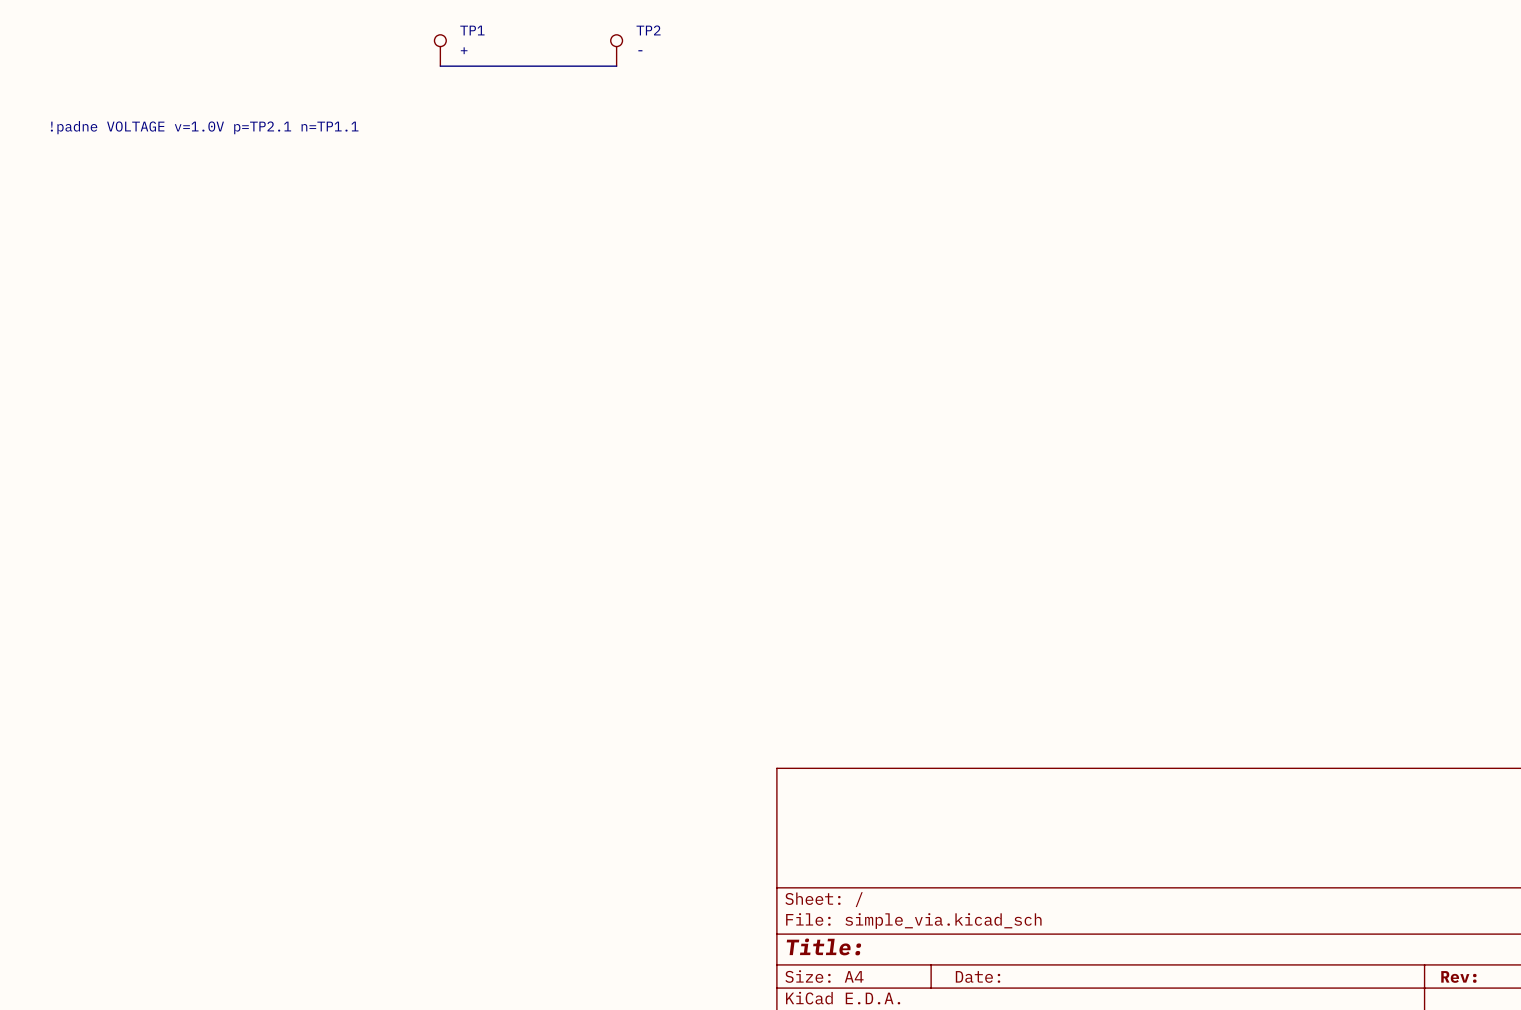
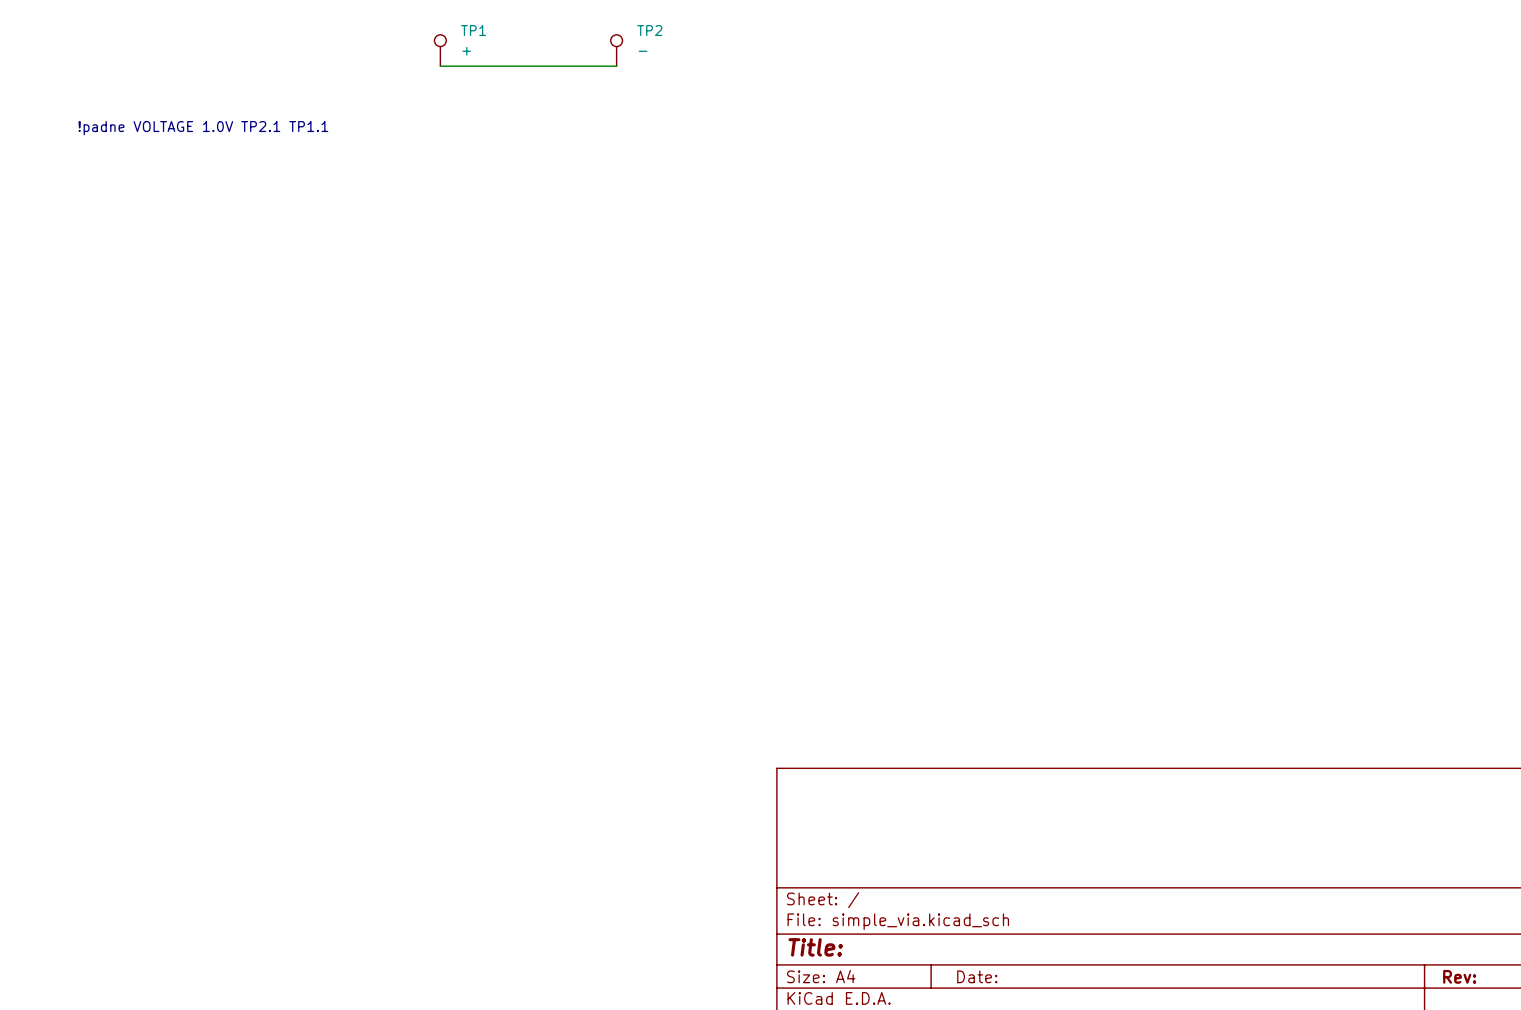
text: !padne VOLTAGE v=1.0V p=TP2.1 n=TP1.1 (204, 127) -> !padne VOLTAGE 1.0V TP2.1 TP1.1 (203, 128)

